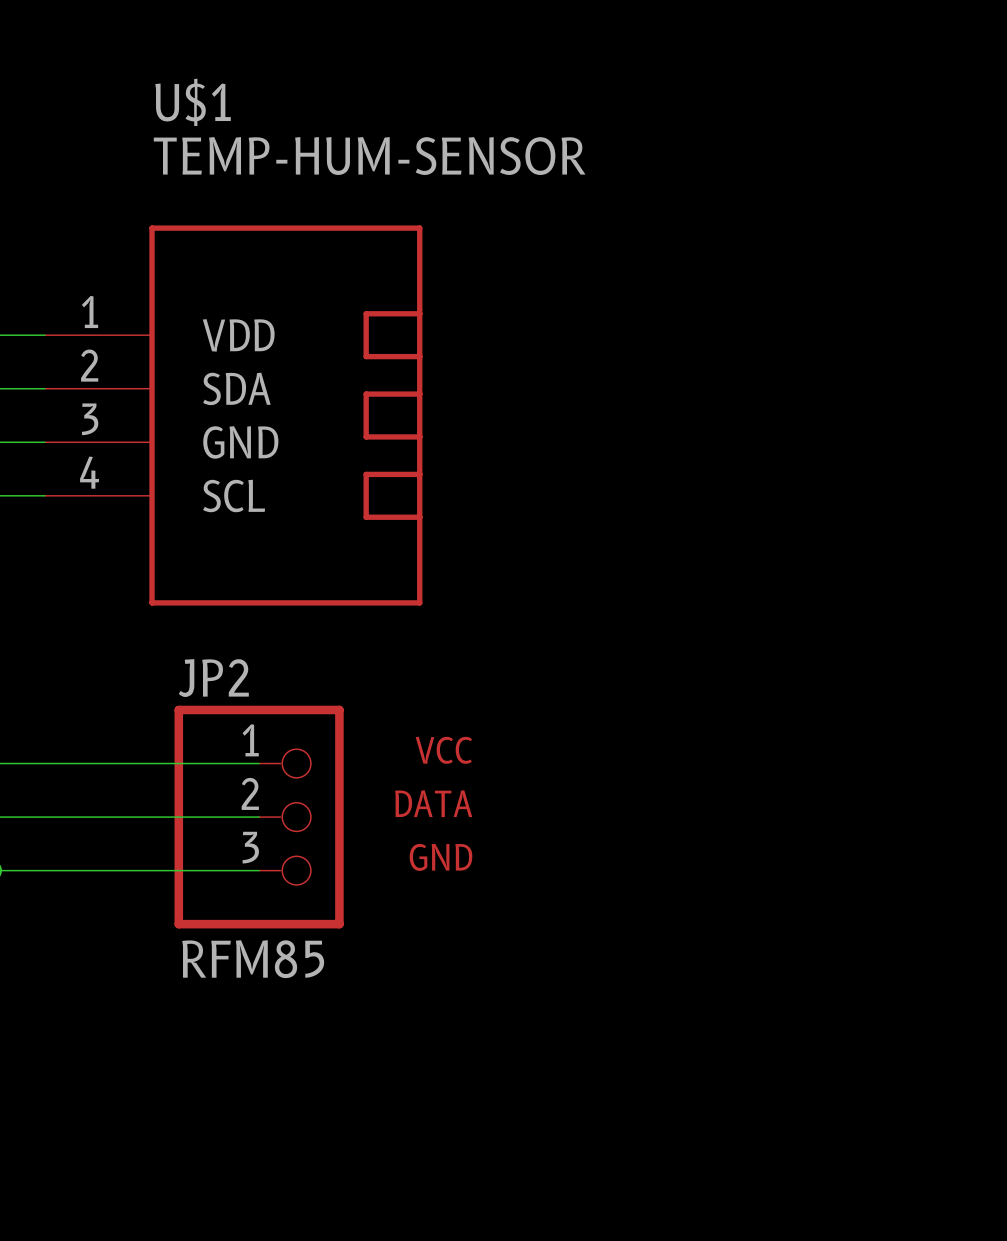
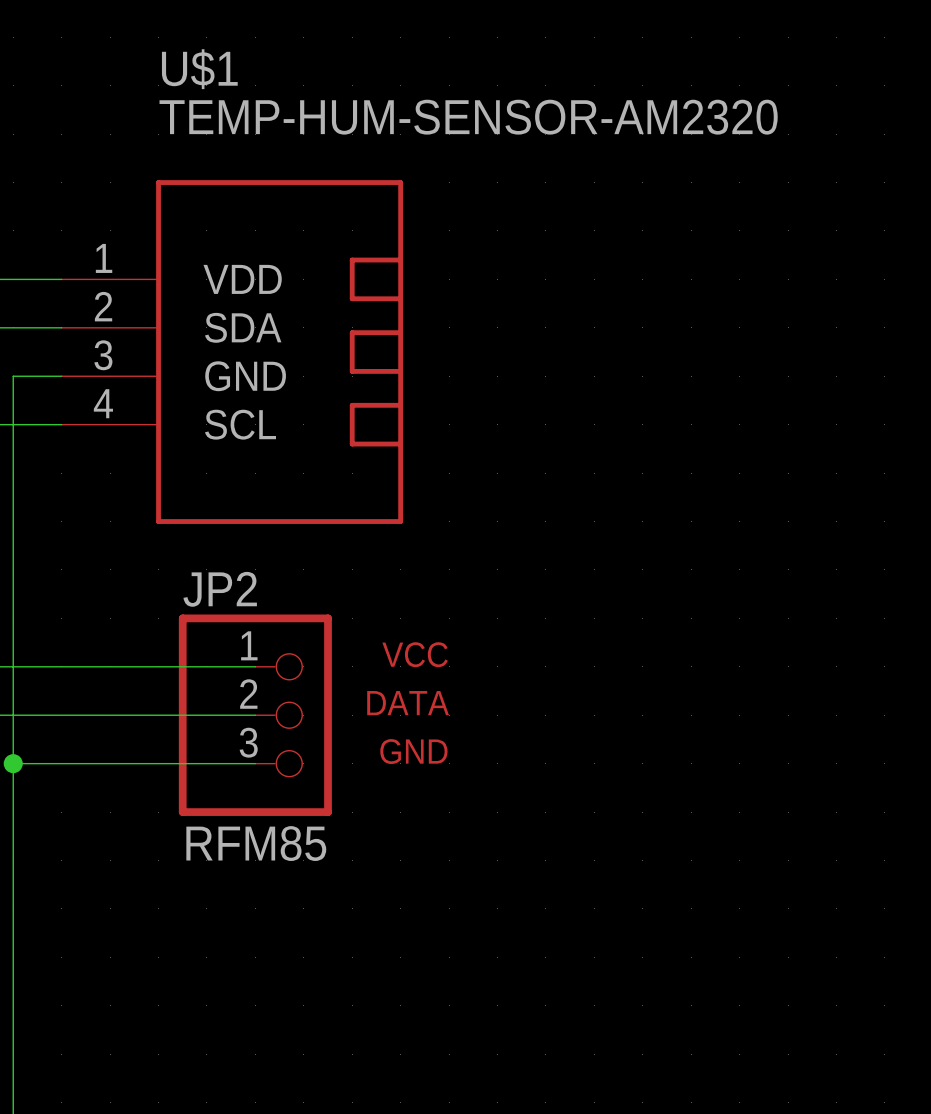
U$1 value: TEMP-HUM-SENSOR (369, 156) -> TEMP-HUM-SENSOR-AM2320 (468, 117)

